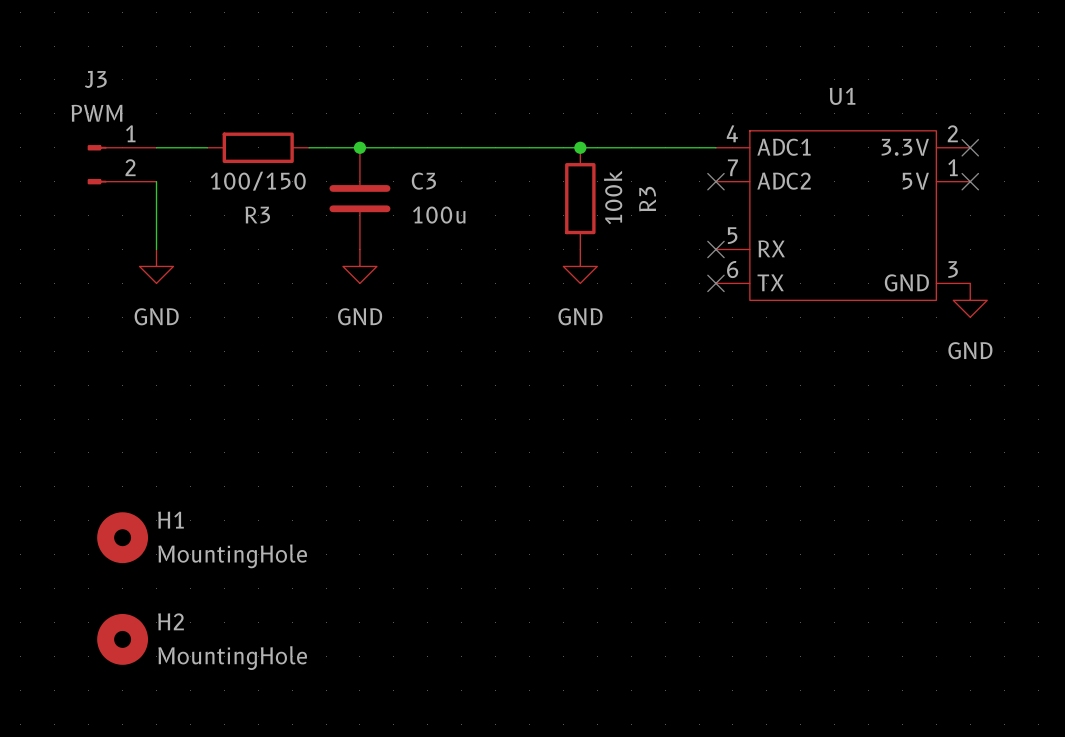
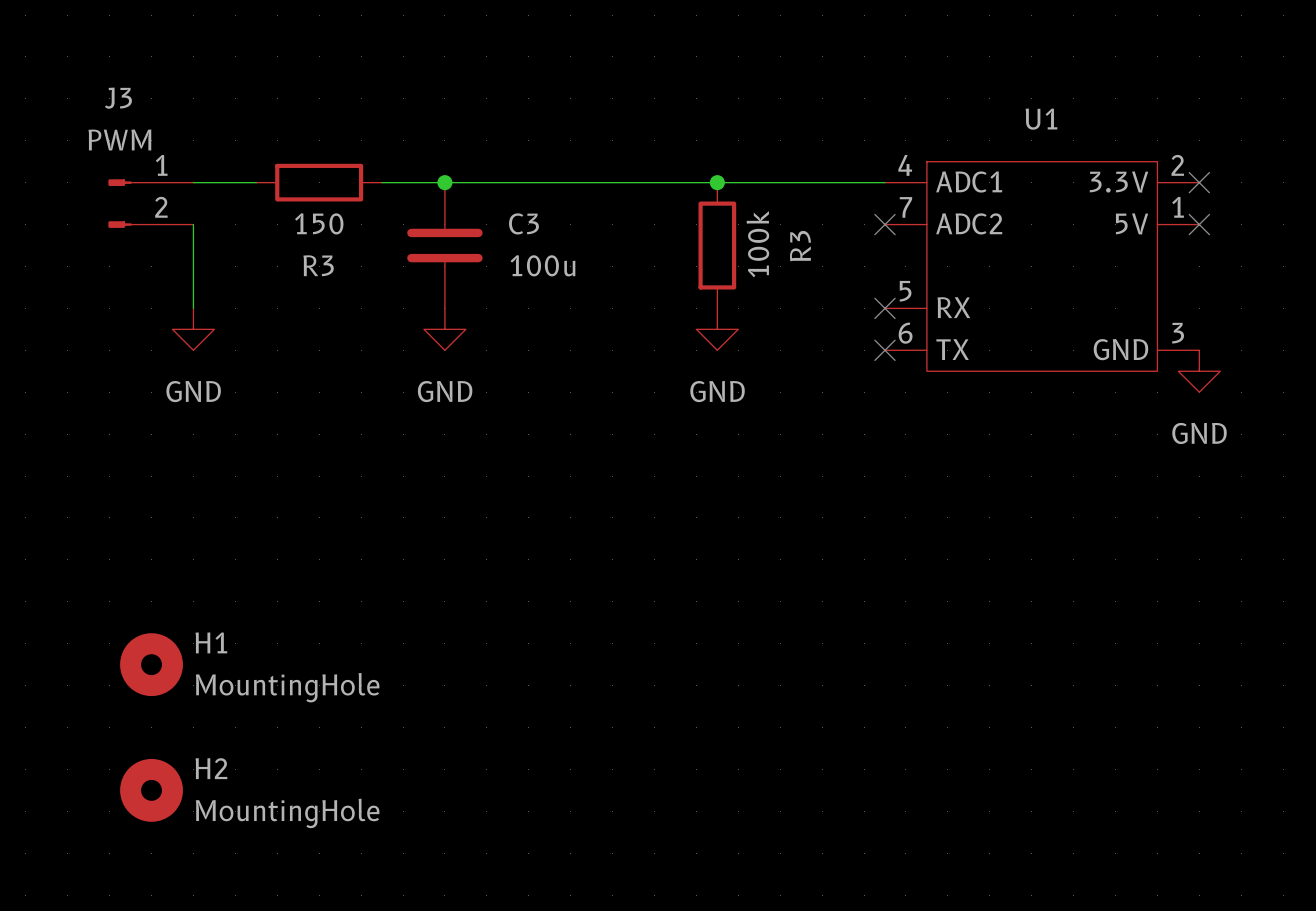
R3 value: 100/150 (258, 181) -> 150 (319, 223)

